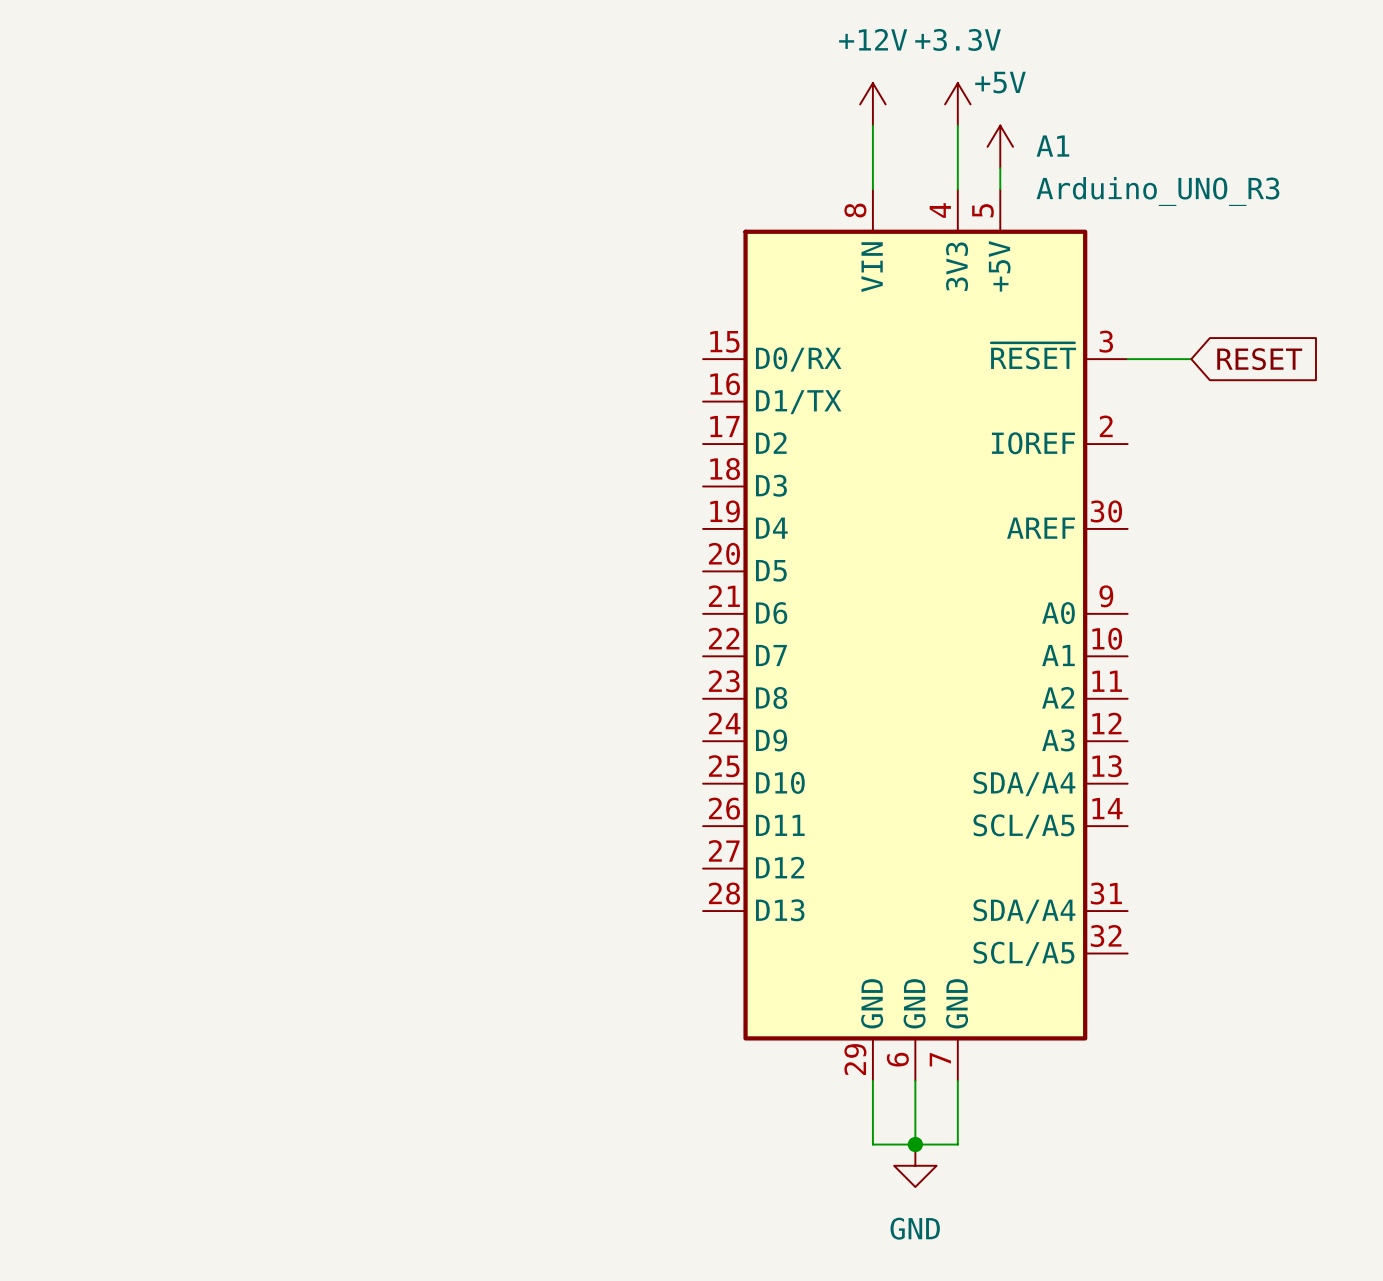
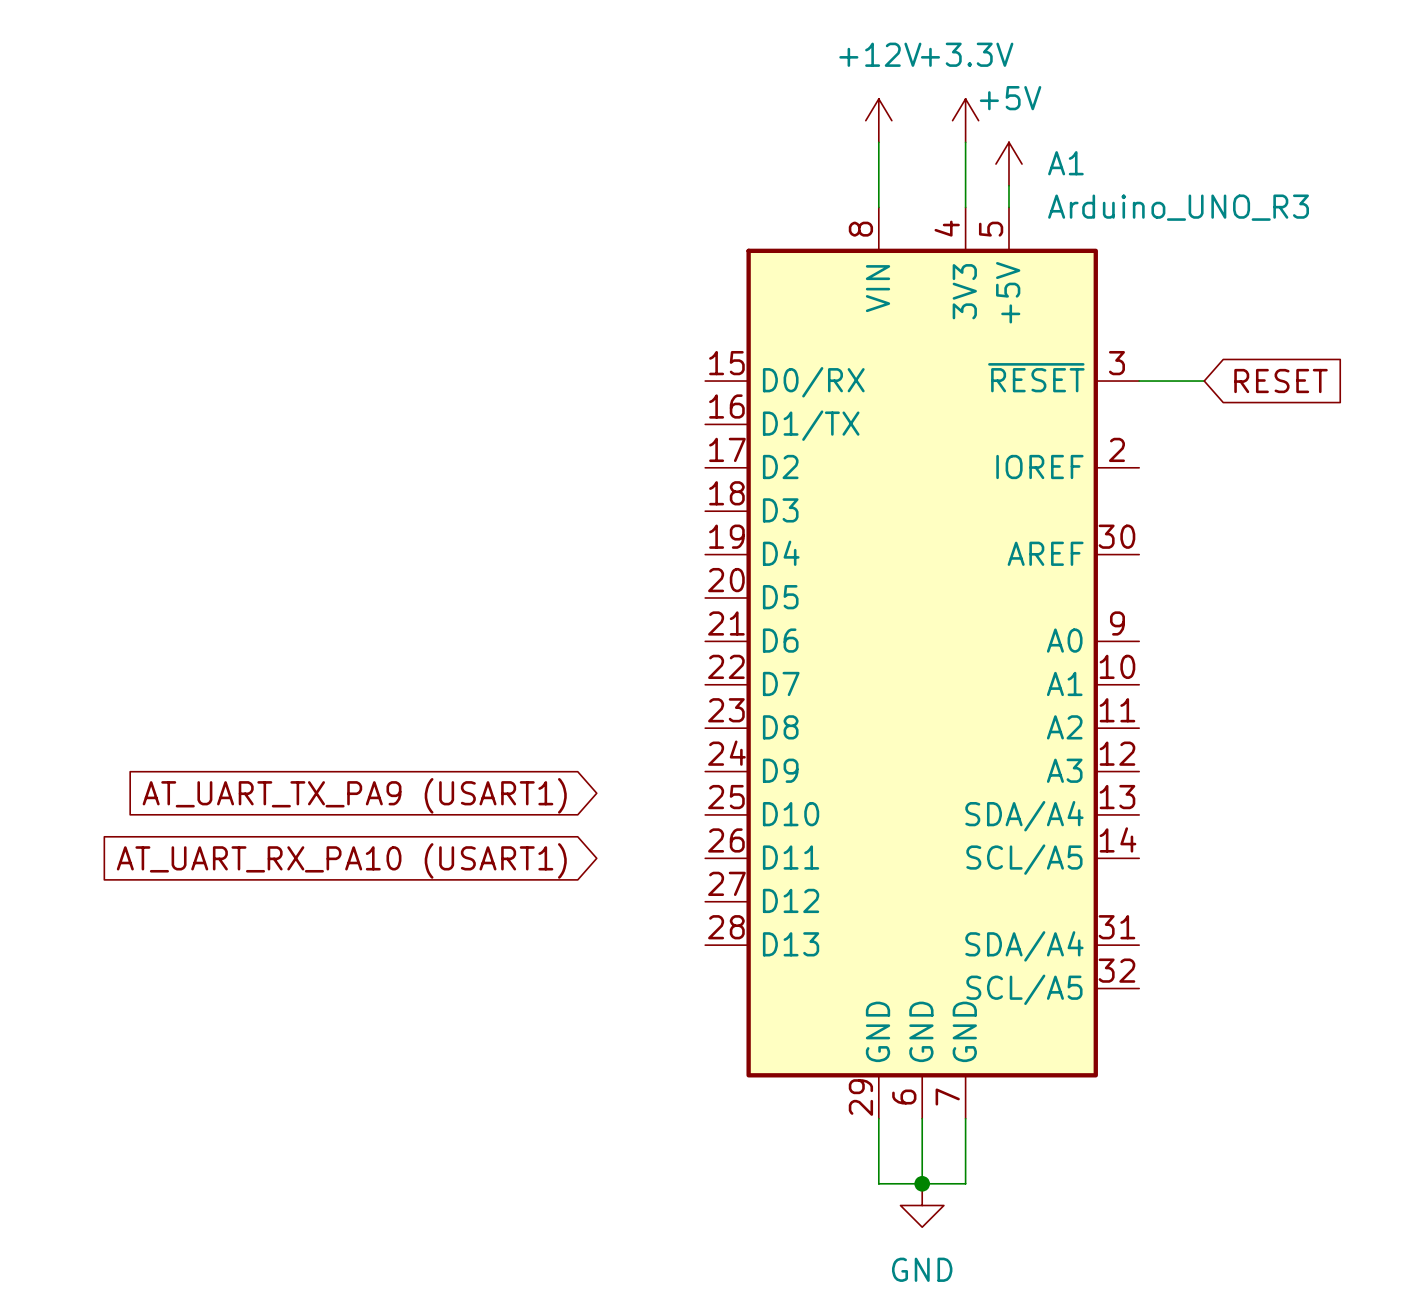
global label: none -> AT_UART_TX_PA9 (USART1) (354, 795)
global label: none -> AT_UART_RX_PA10 (USART1) (341, 860)

